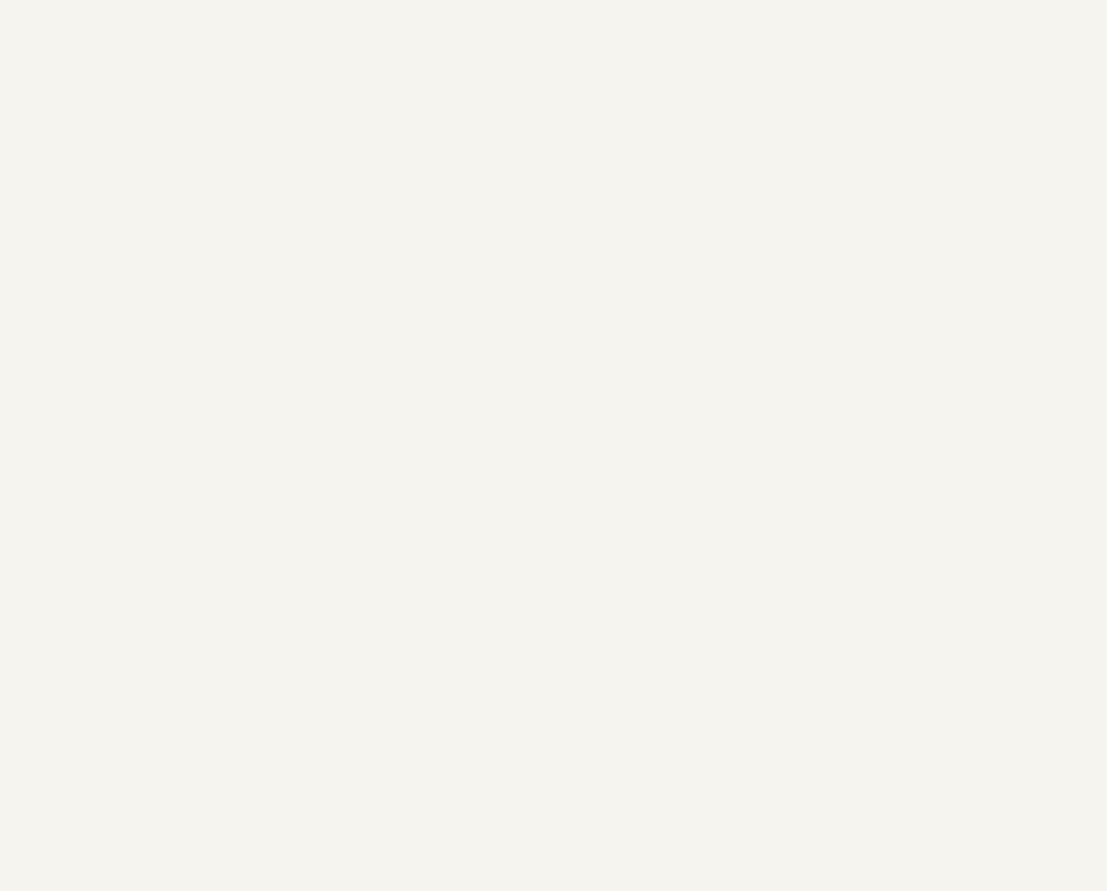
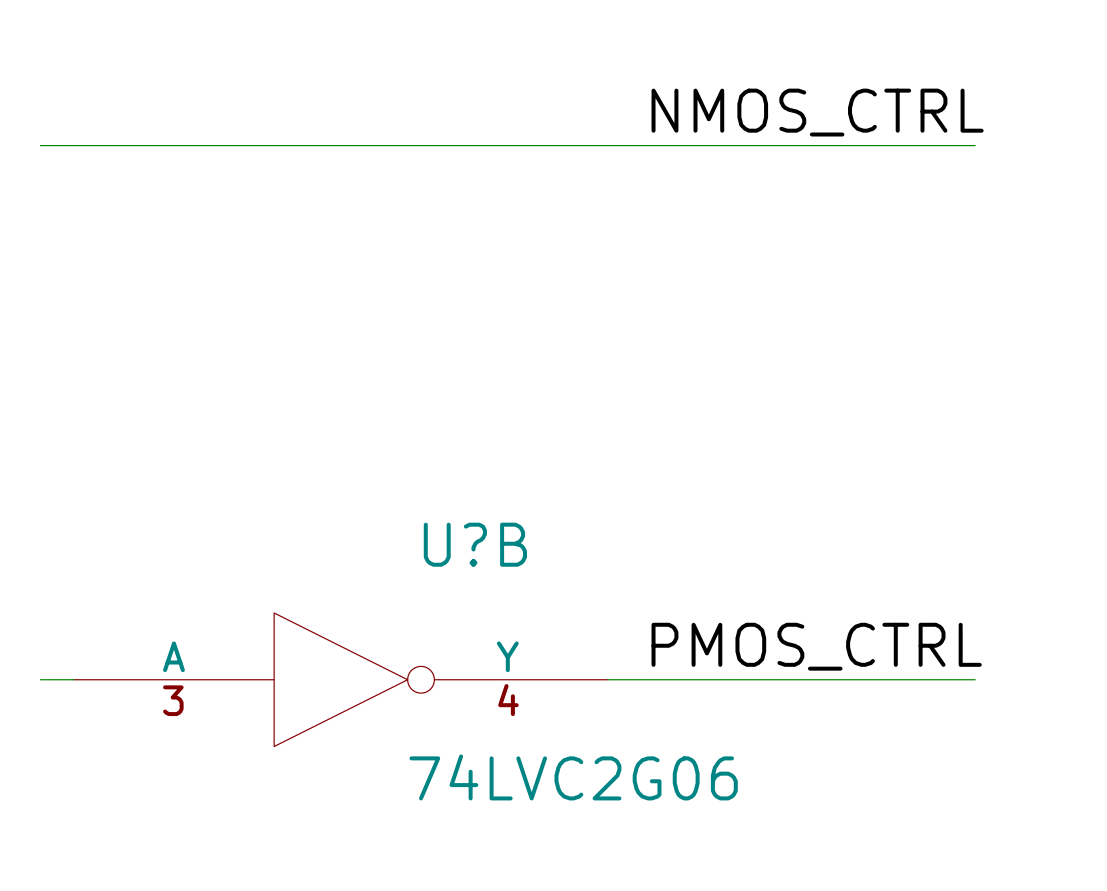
label: none -> NMOS_CTRL (817, 112)
wire: none -> (40, 145) (975, 145)
label: none -> PMOS_CTRL (816, 646)
wire: none -> (40, 679) (73, 679)
U?B: none -> 74LVC2G06 (340, 679)
wire: none -> (607, 679) (975, 679)

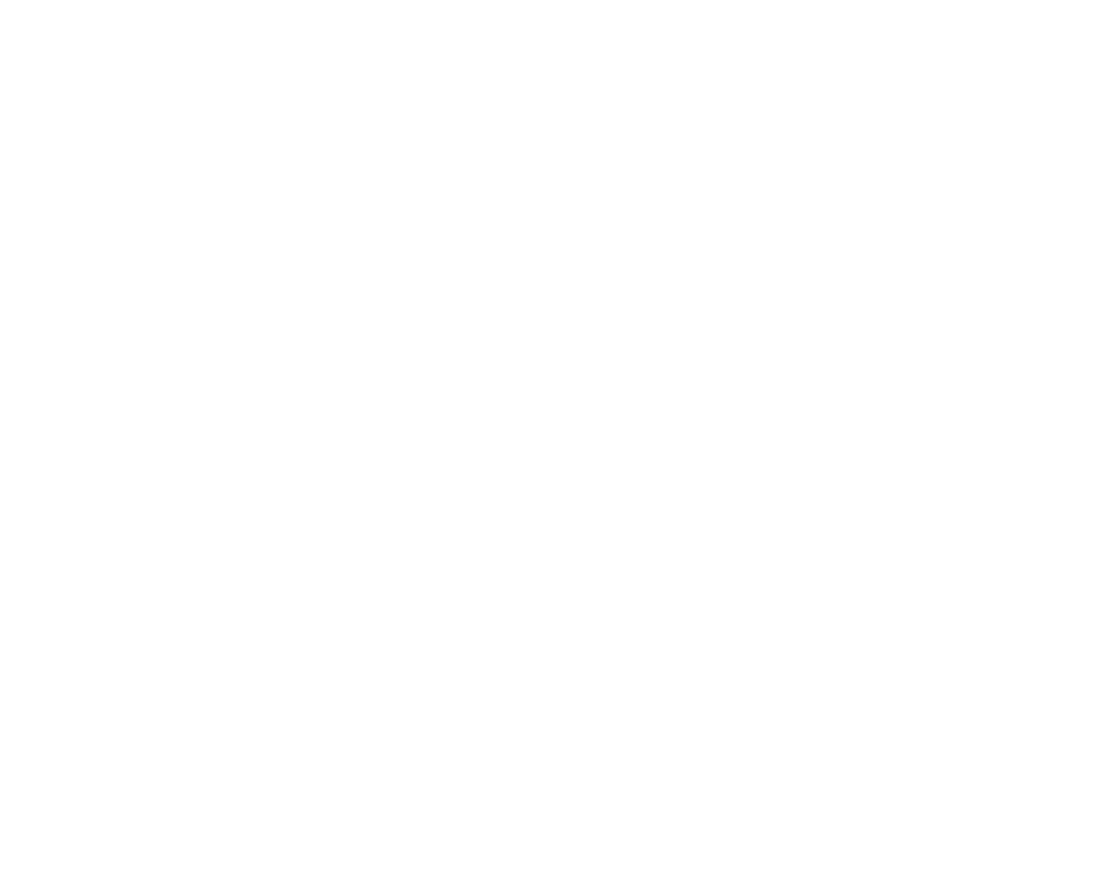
label: NMOS_CTRL (817, 112) -> none
wire: (40, 145) (975, 145) -> none
label: PMOS_CTRL (816, 646) -> none
wire: (40, 679) (73, 679) -> none
U?B: 74LVC2G06 (340, 679) -> none
wire: (607, 679) (975, 679) -> none

